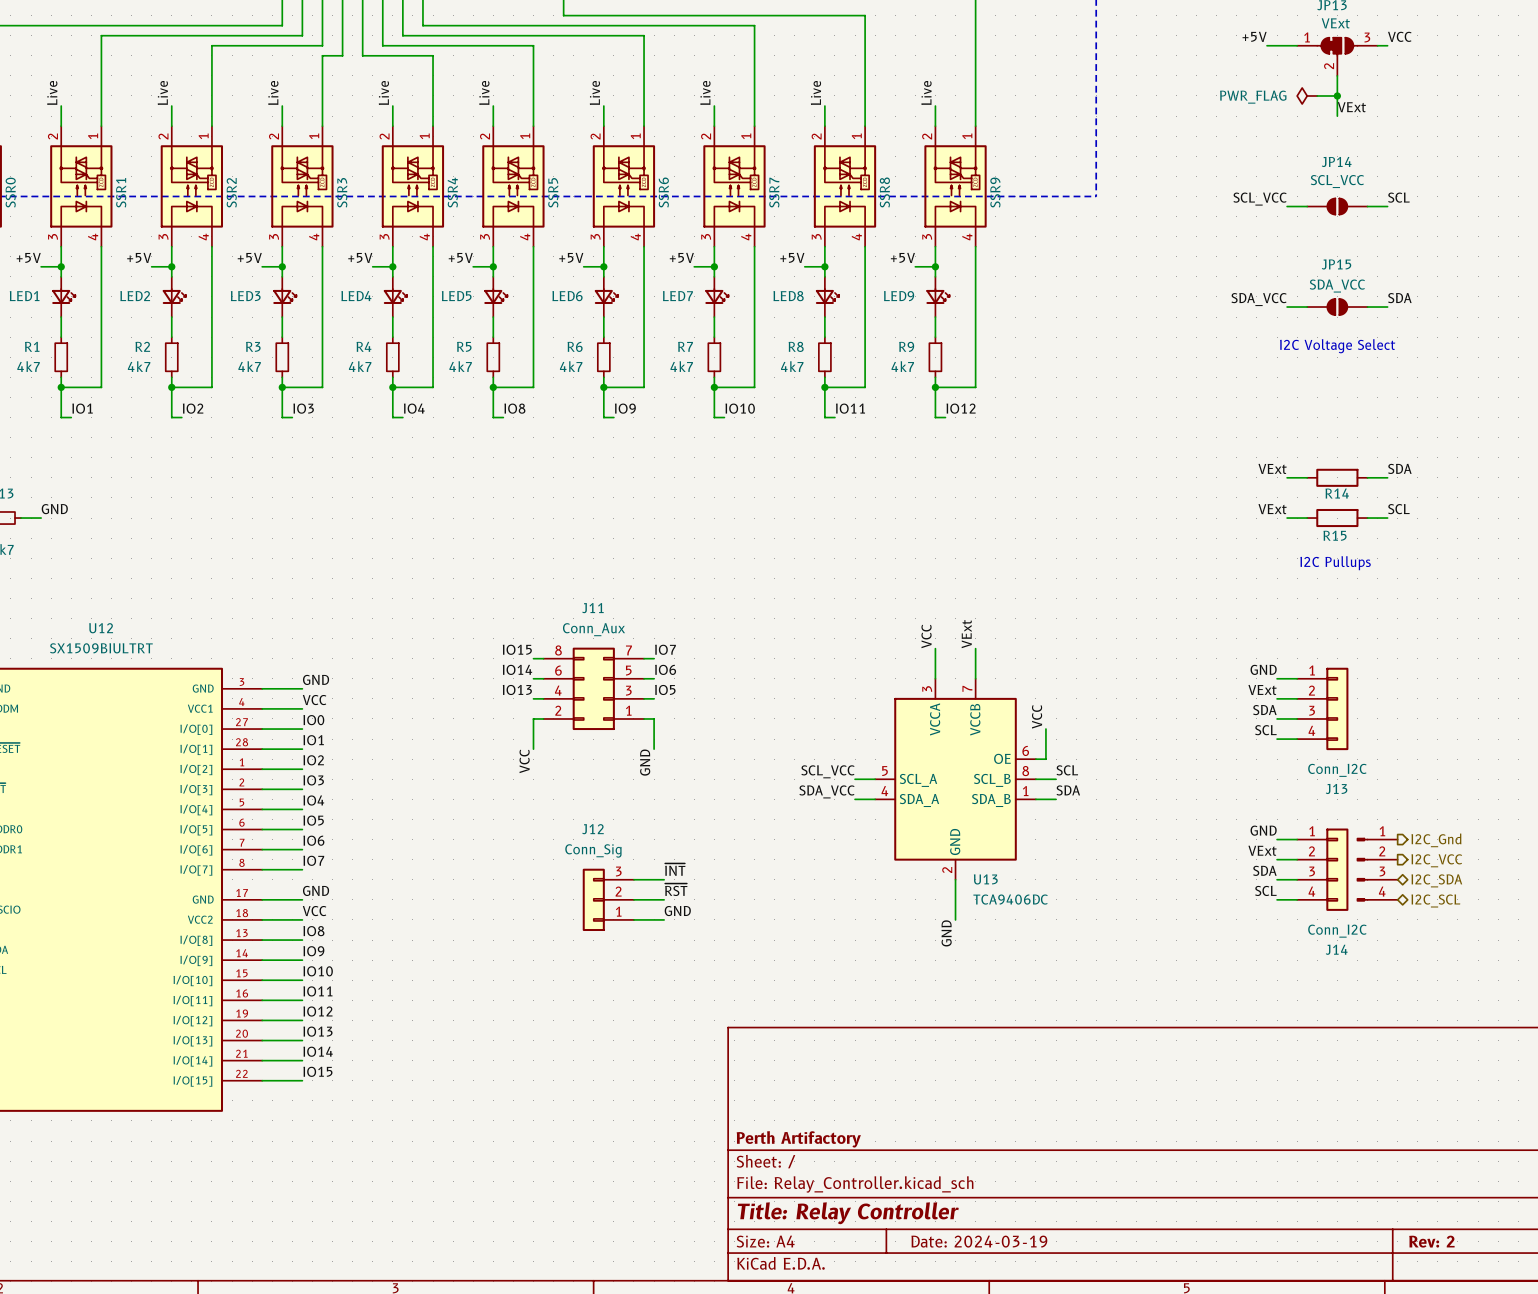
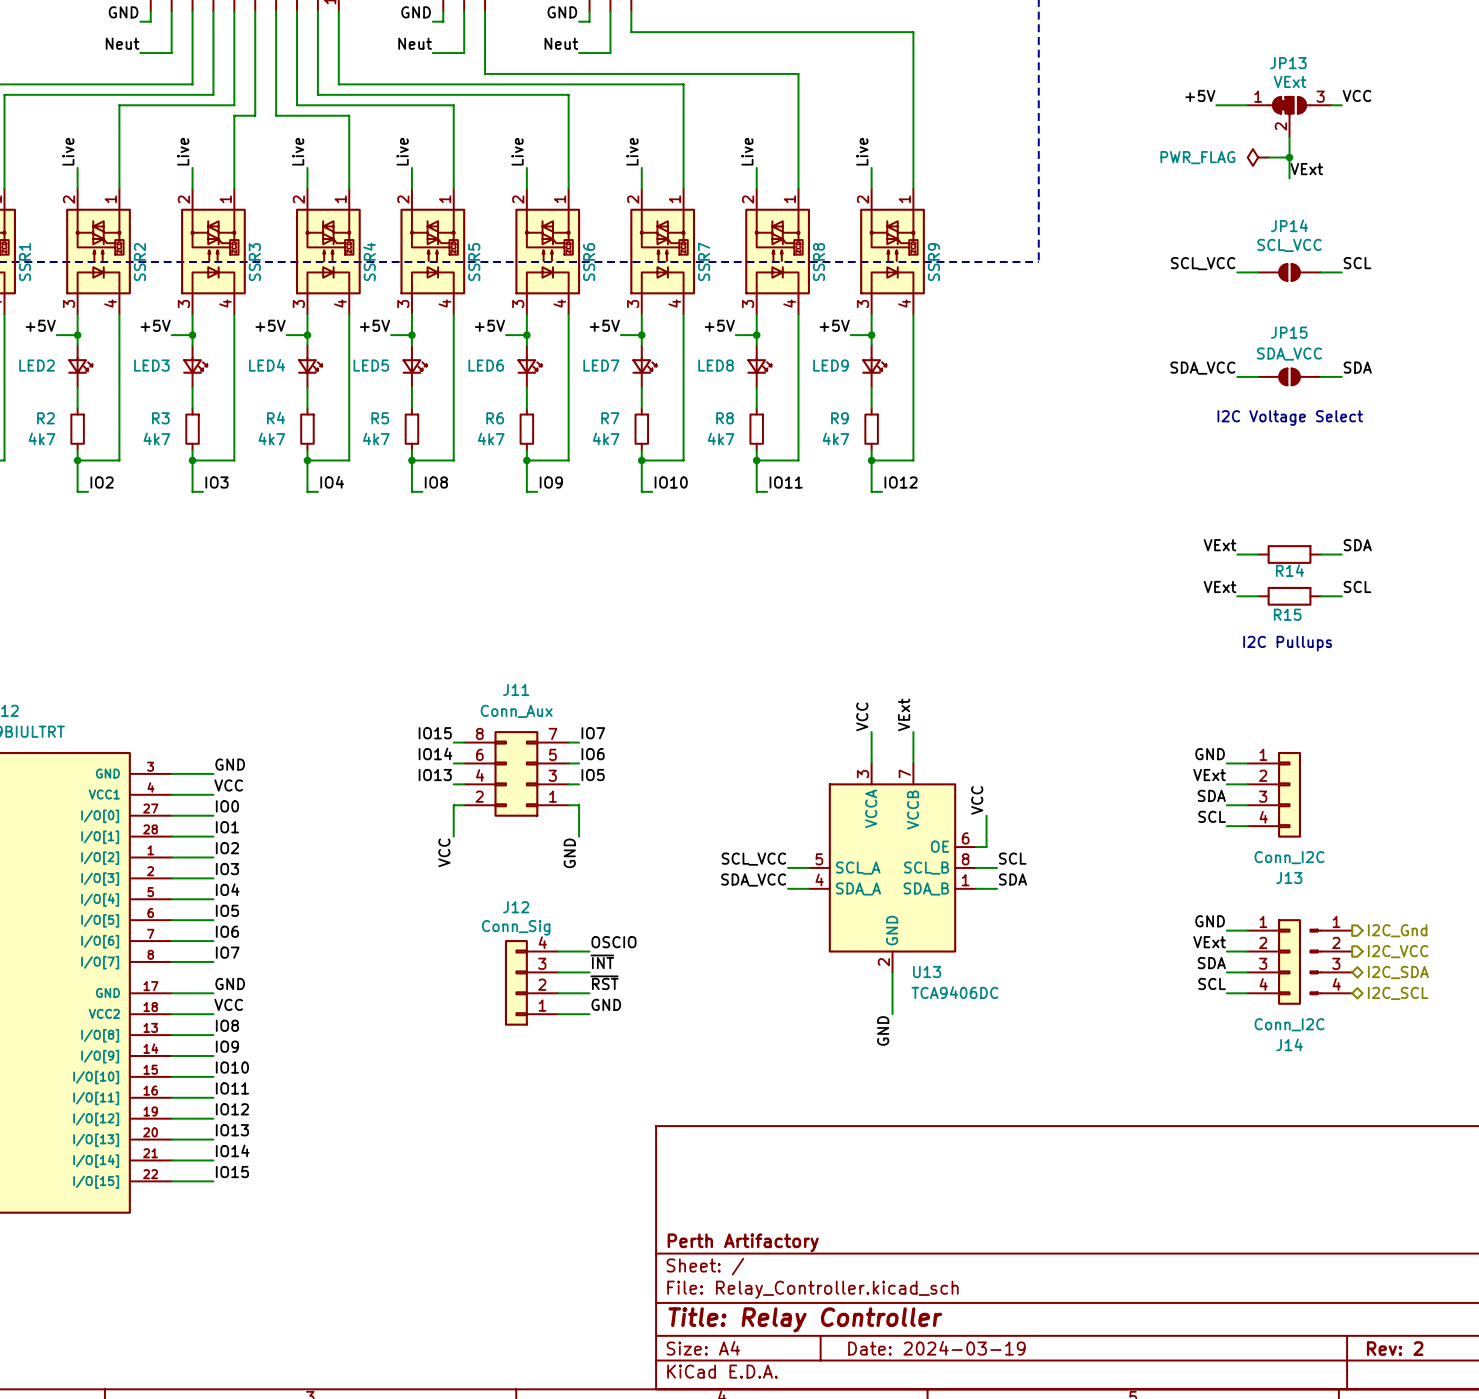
label: none -> OSCIO (614, 942)
wire: none -> (558, 951) (589, 951)
J12 symbol: [582, 868, 634, 932] -> [504, 940, 559, 1026]

